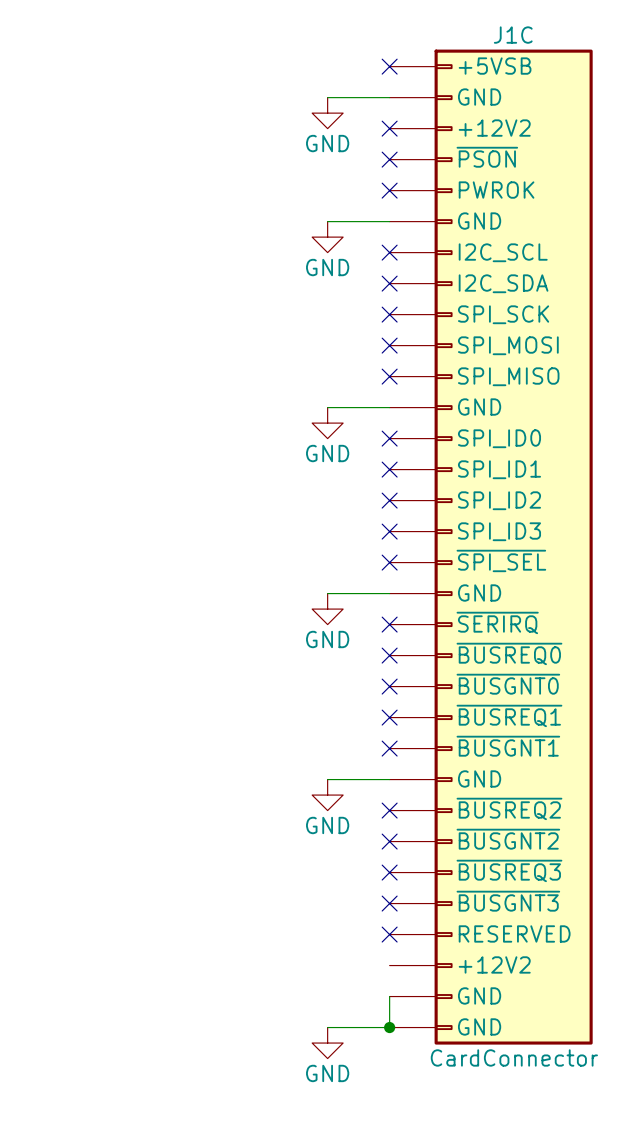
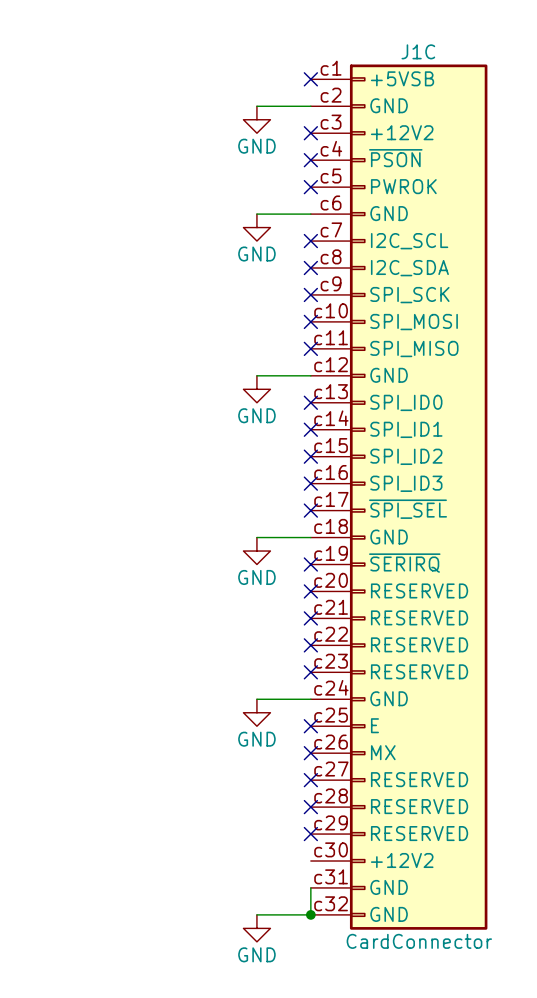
J1C symbol: [389, 49, 593, 1045] -> [310, 64, 488, 930]

